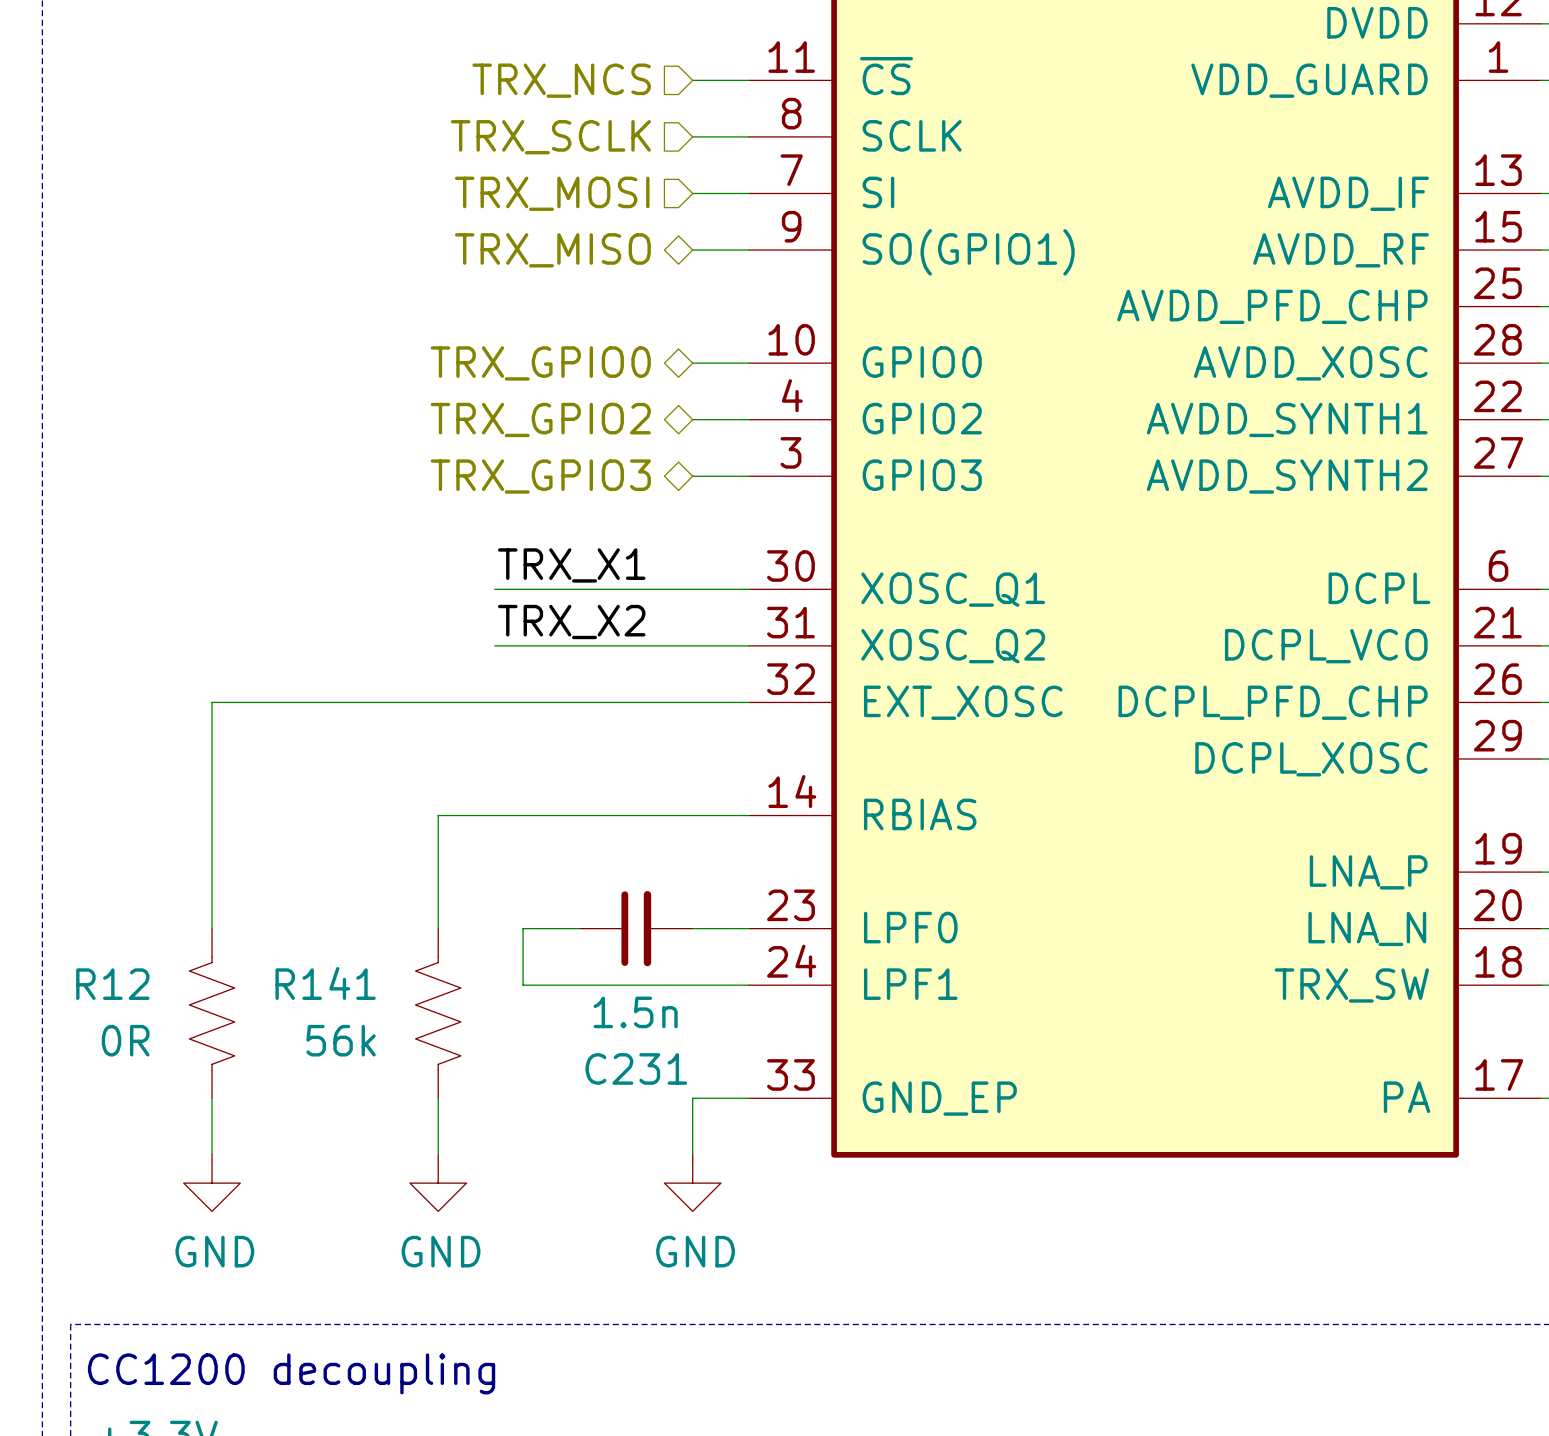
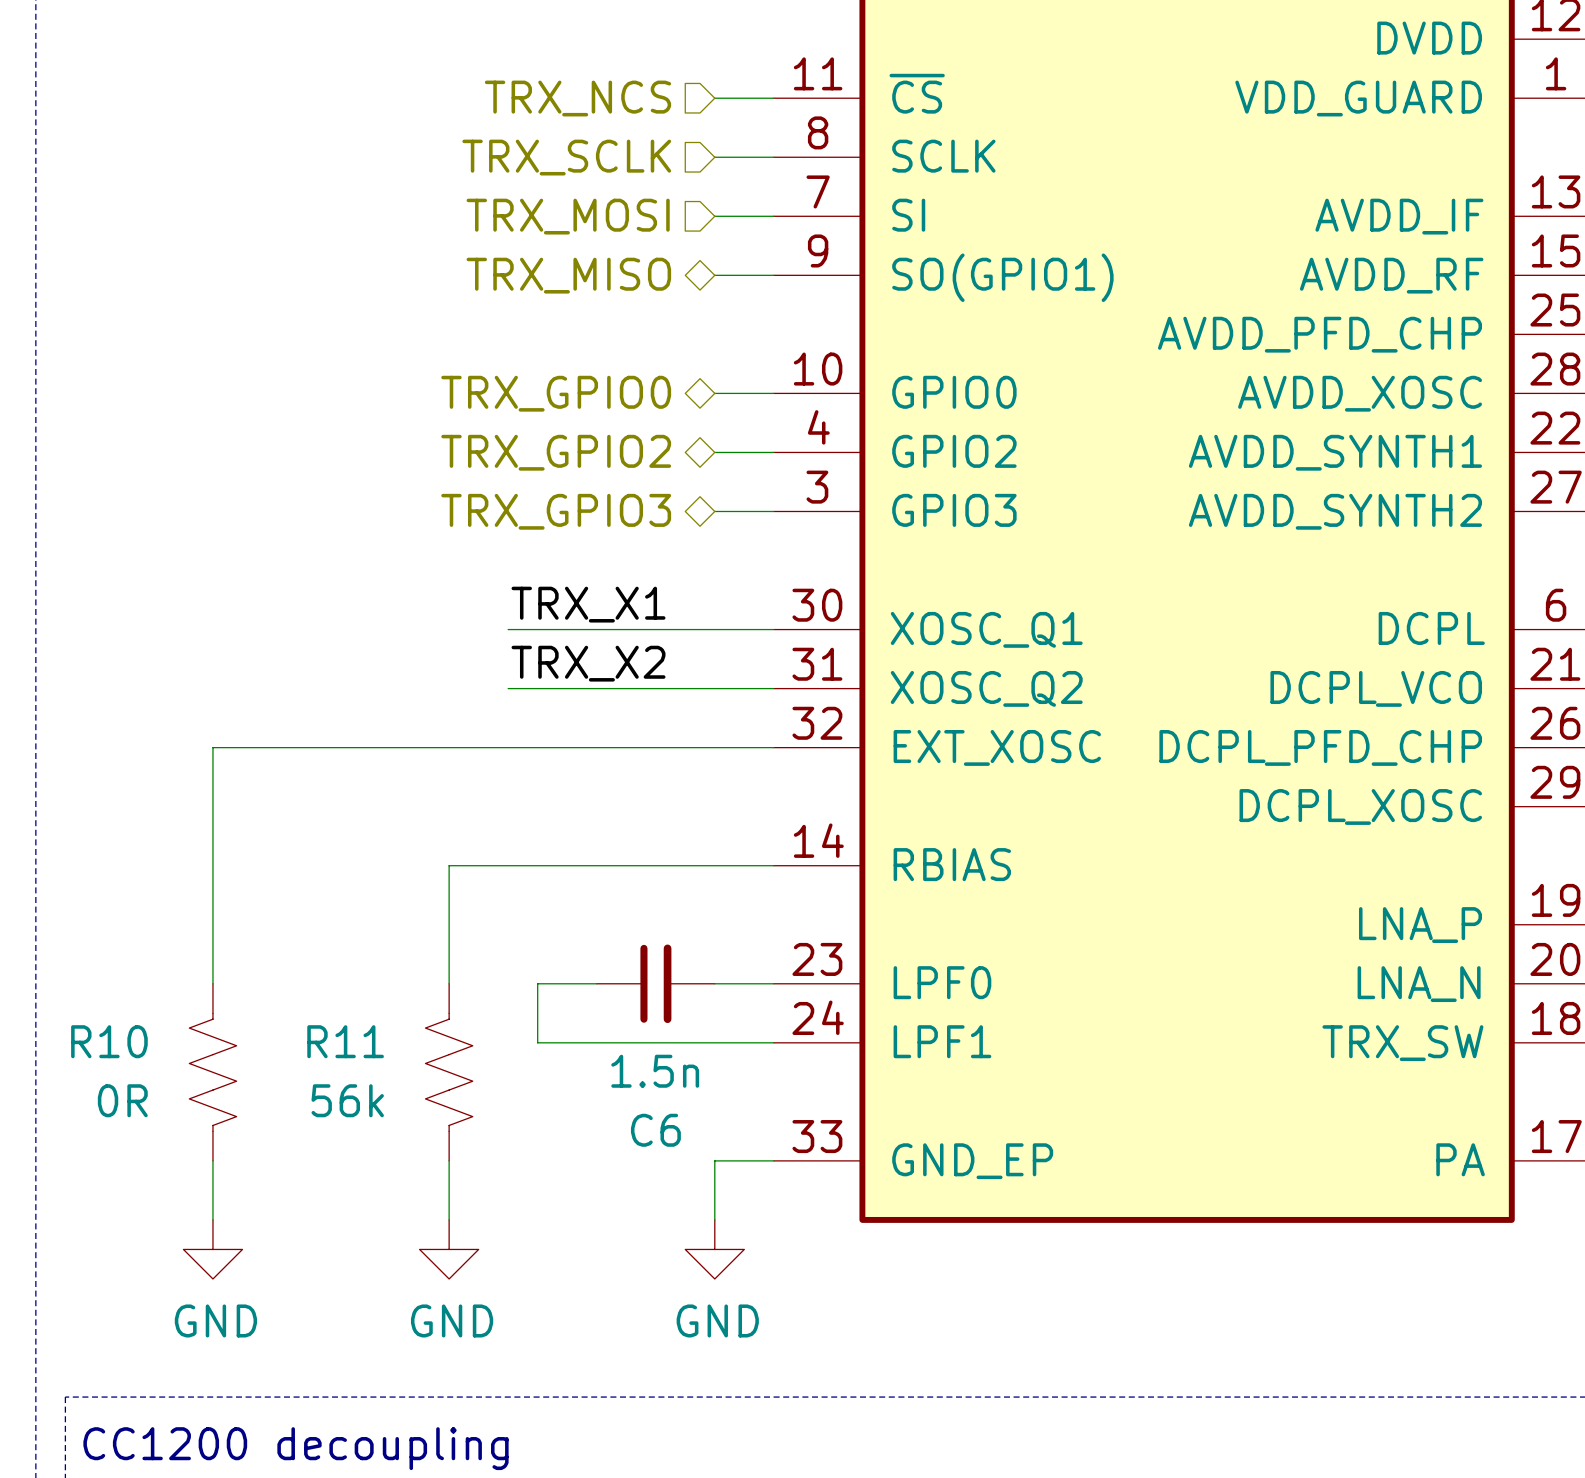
R141 name: R141 (325, 983) -> R11 (345, 1041)
R12 name: R12 (112, 984) -> R10 (109, 1041)
C231 name: C231 (636, 1068) -> C6 (655, 1130)

